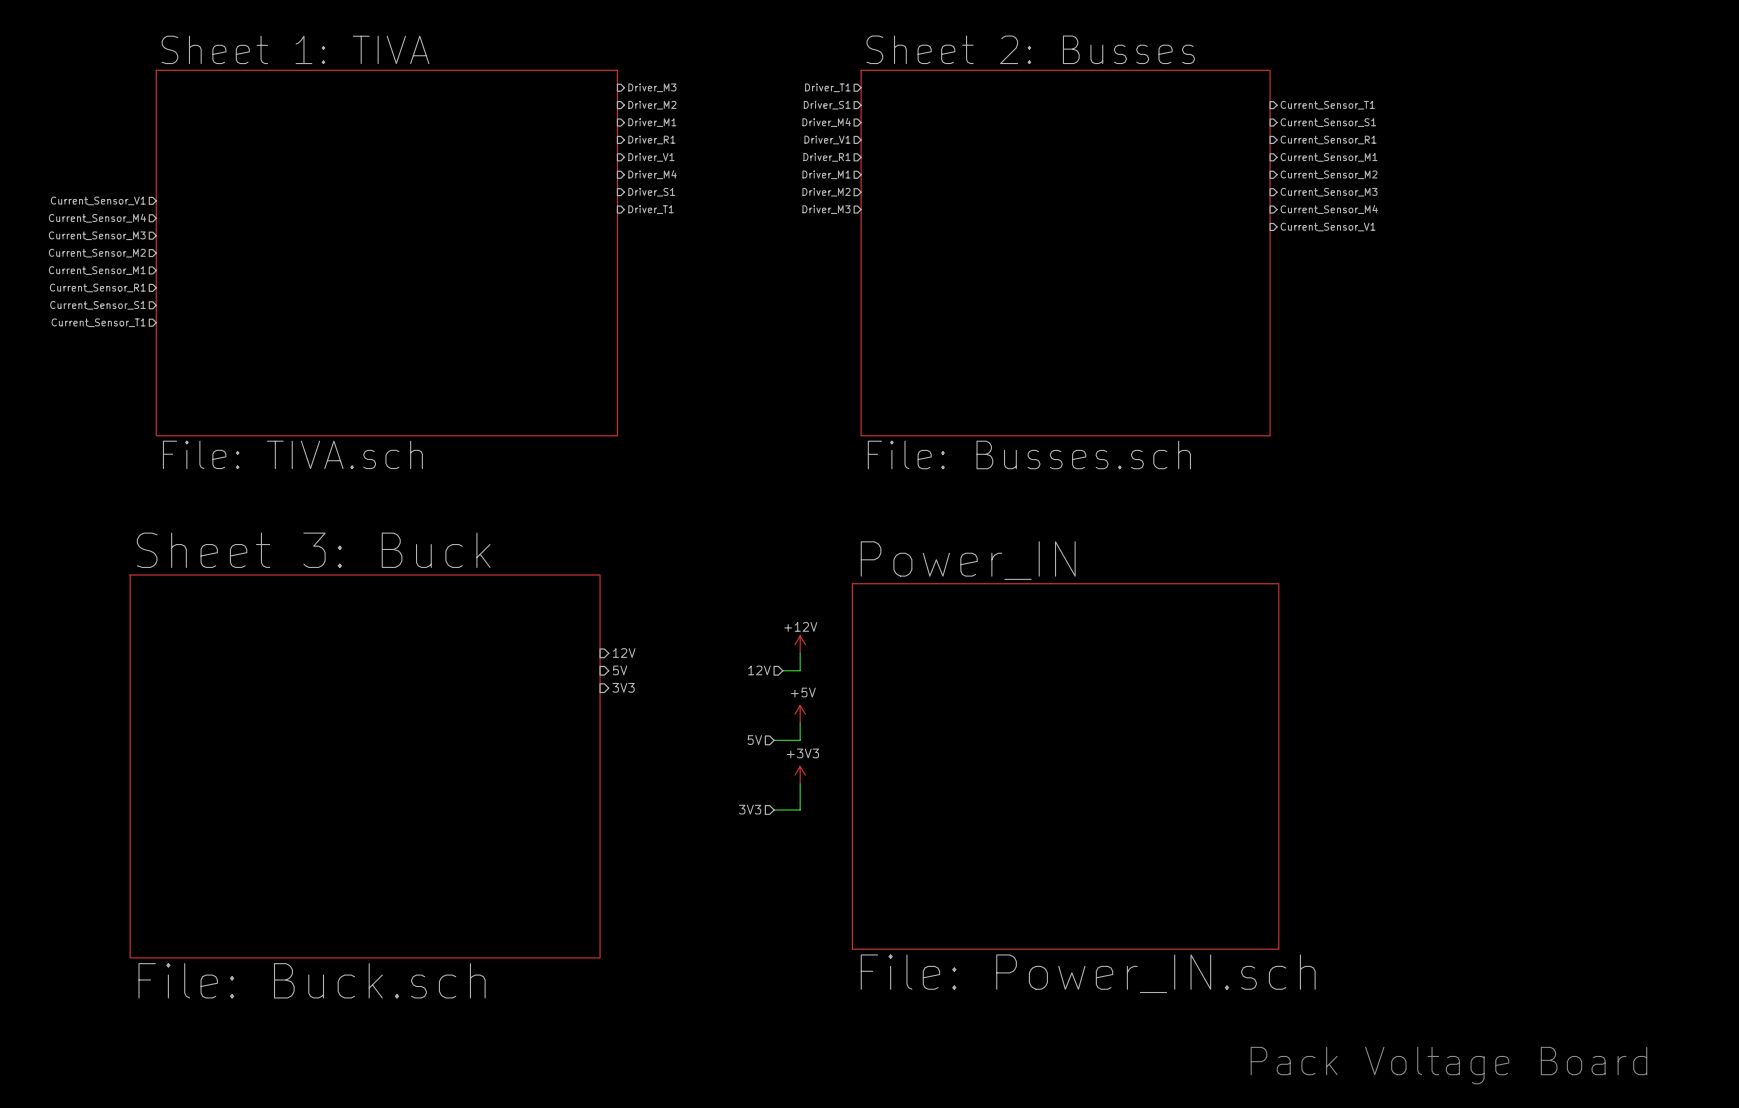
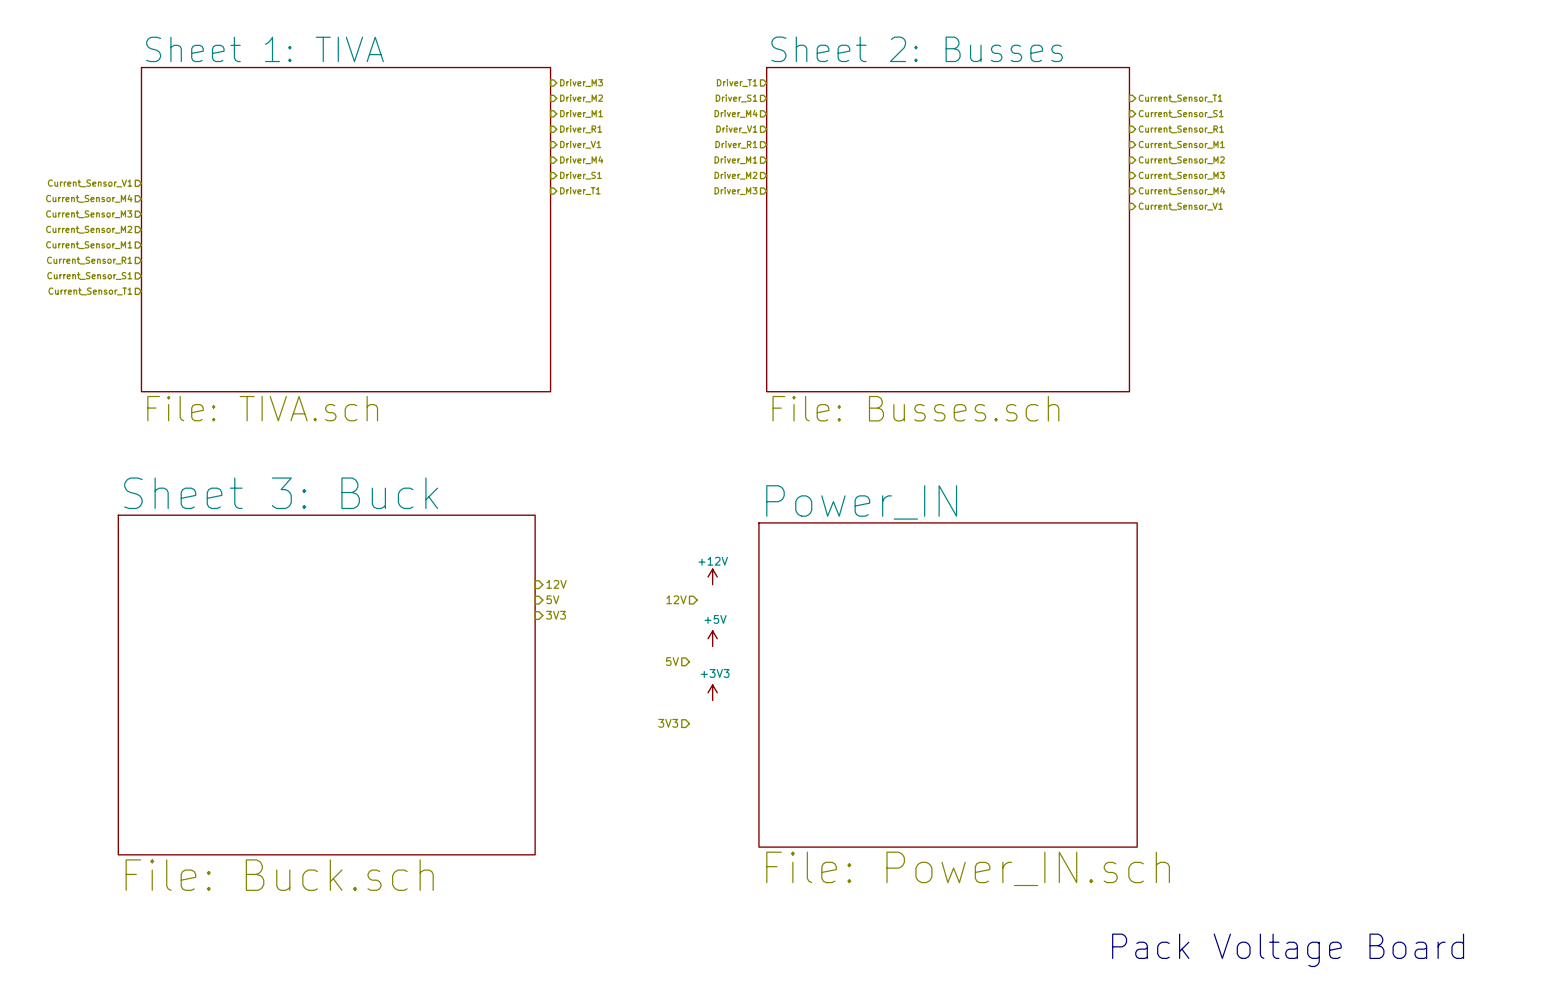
wire: (800, 653) (800, 670) (782, 670) -> none
wire: (800, 722) (800, 740) (774, 740) -> none
wire: (800, 783) (800, 809) (774, 809) -> none

